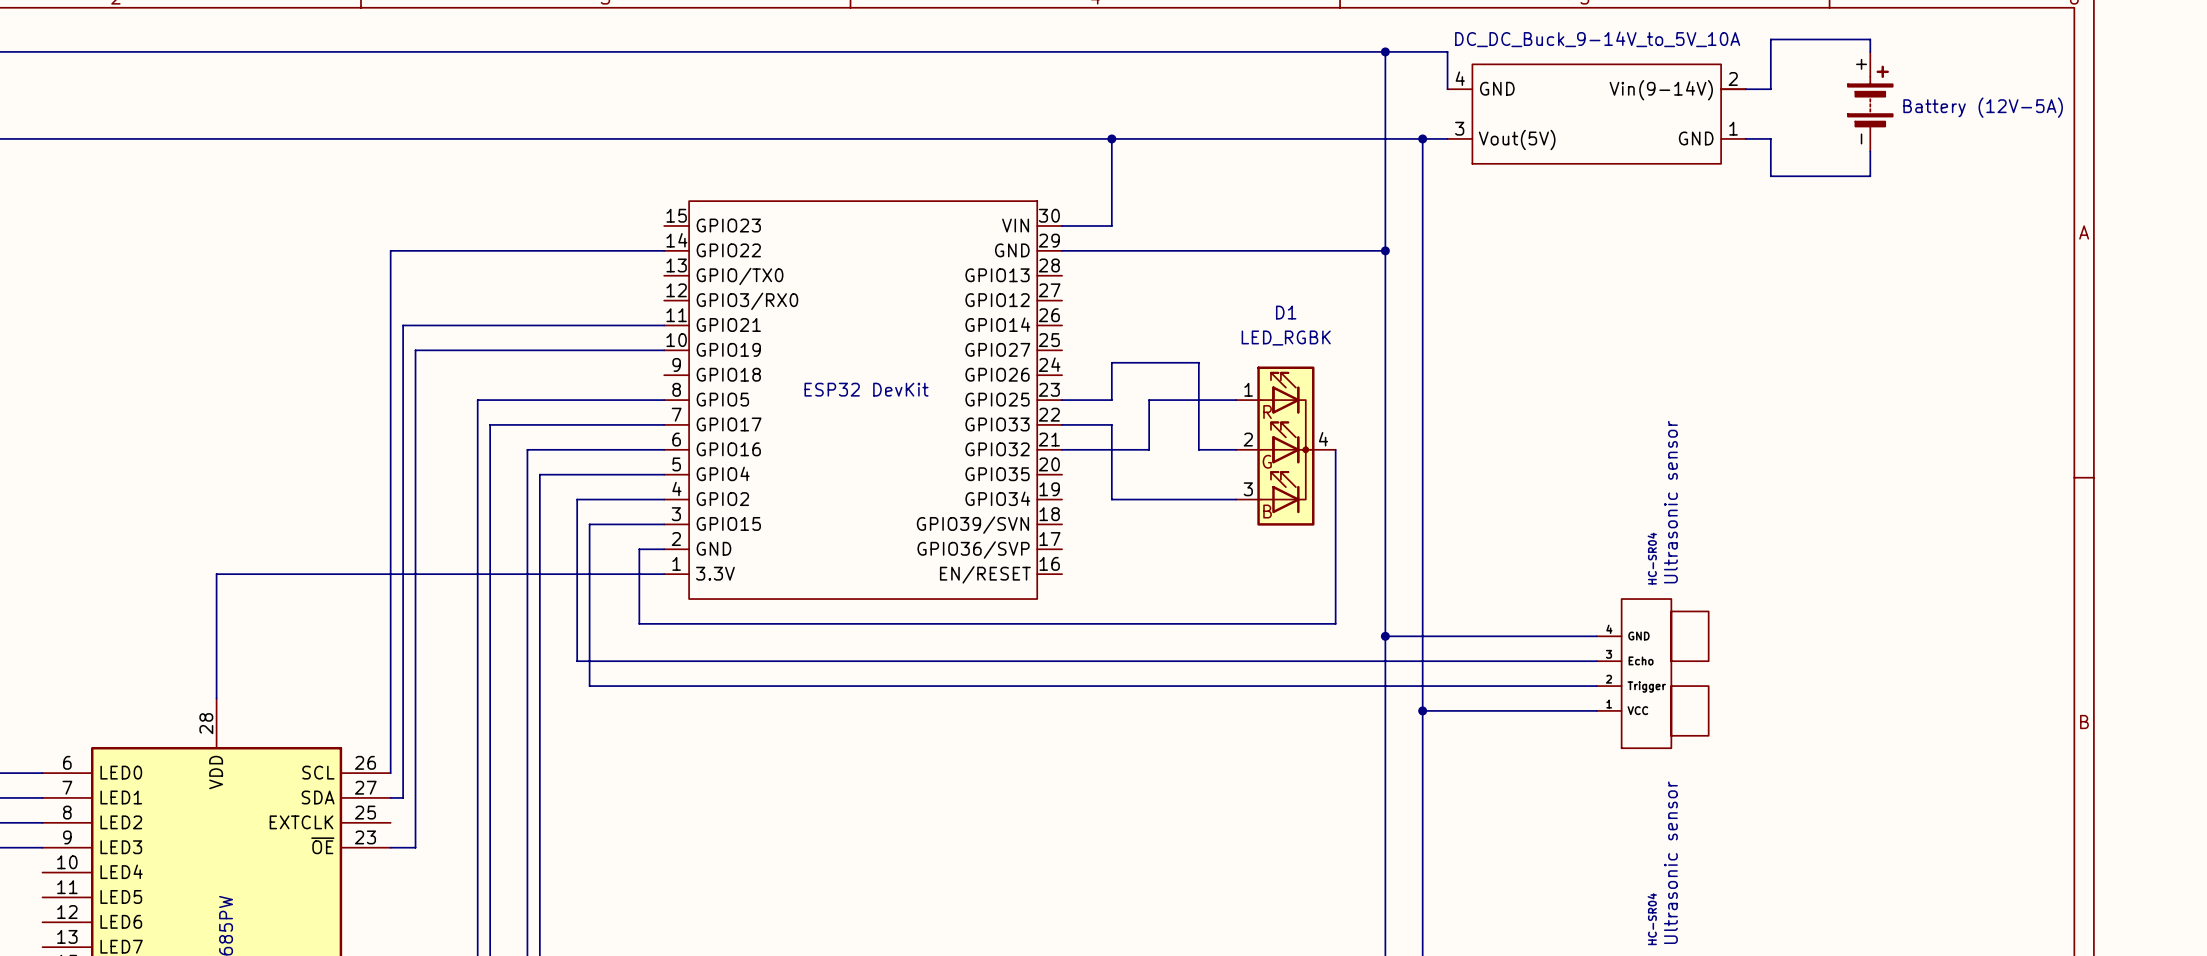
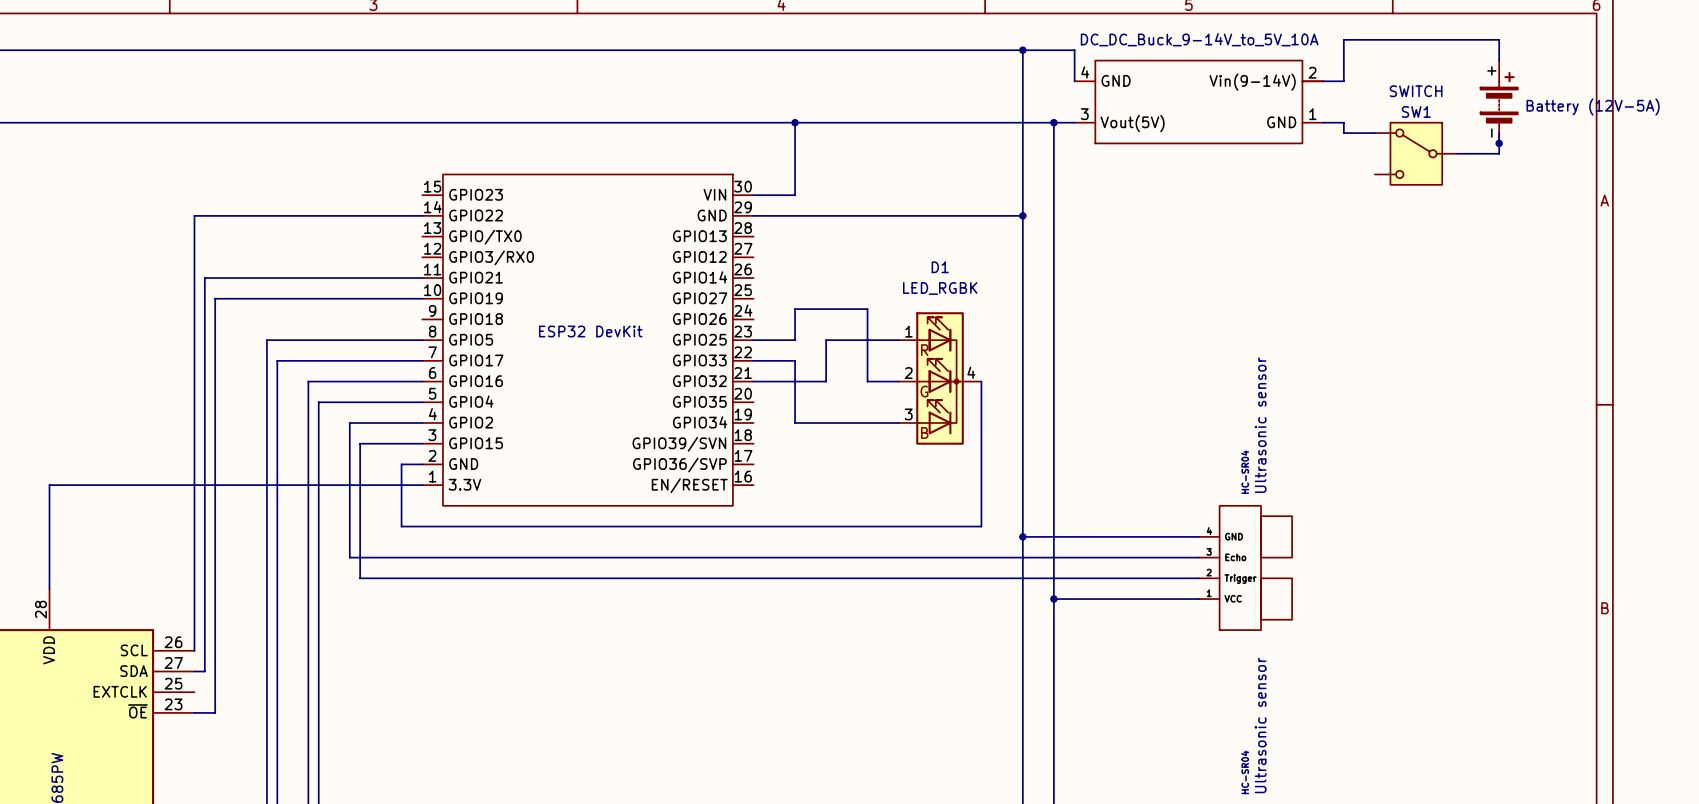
wire: (1870, 39) (1870, 51) -> (1426, 39) (1499, 39) (1499, 60)
part position: (1870, 101) -> (1499, 101)
wire: (1770, 151) (1770, 176) (1870, 176) (1870, 151) -> (1343, 133) (1374, 133)
wire: none -> (1499, 133) (1499, 153) (1457, 153)
junction: none -> (1499, 143)
SWITCH: none -> SW1 (1416, 153)

